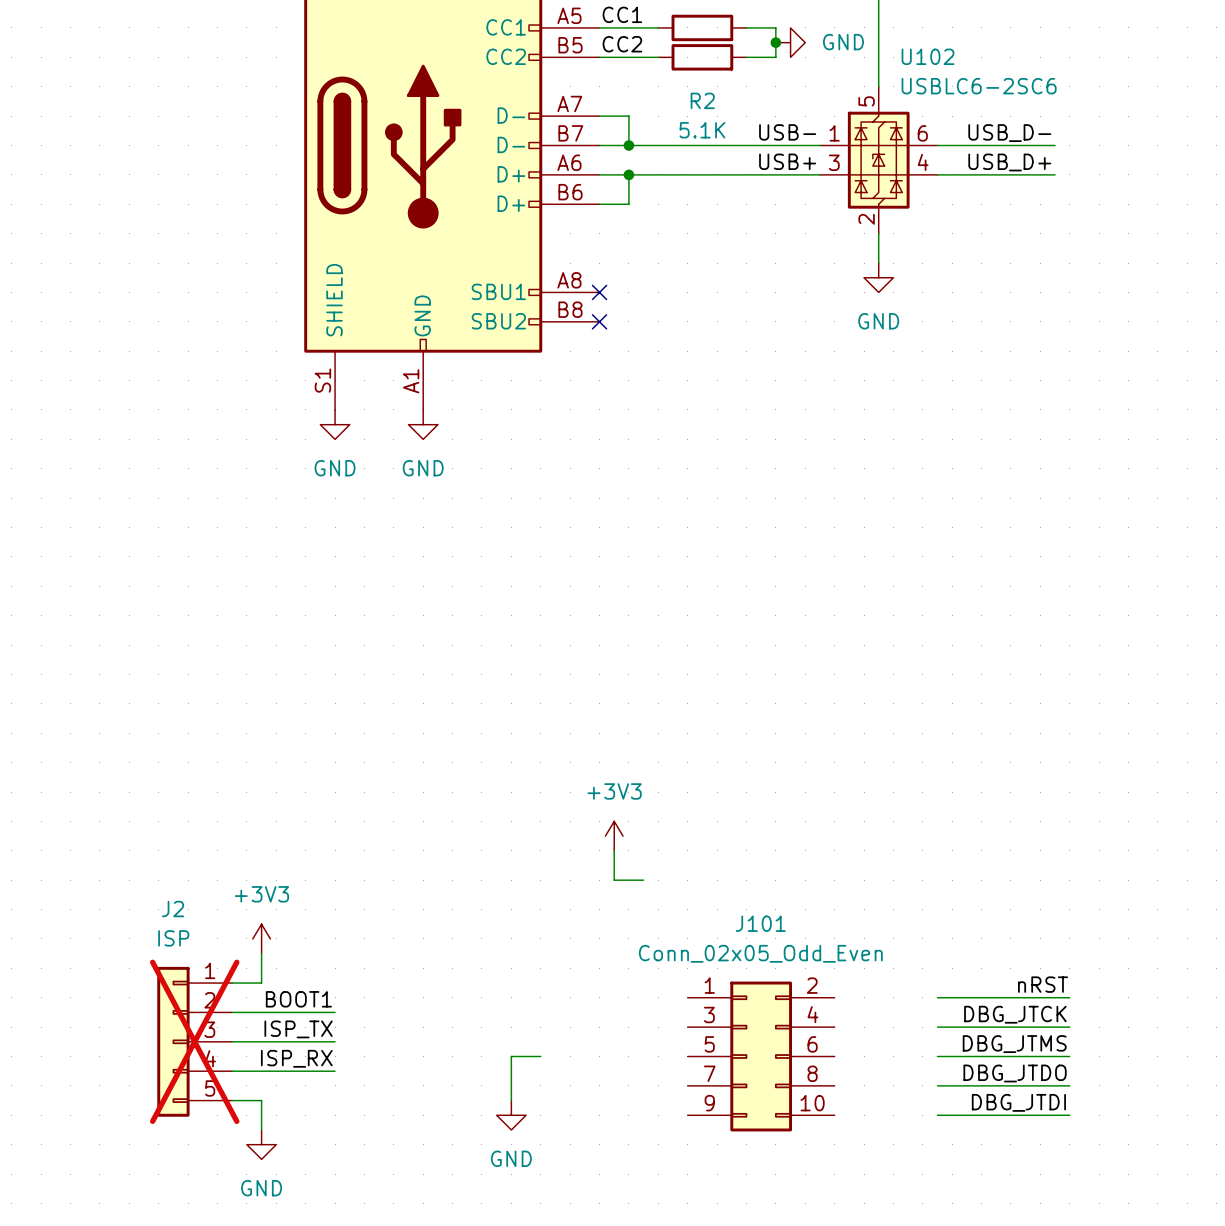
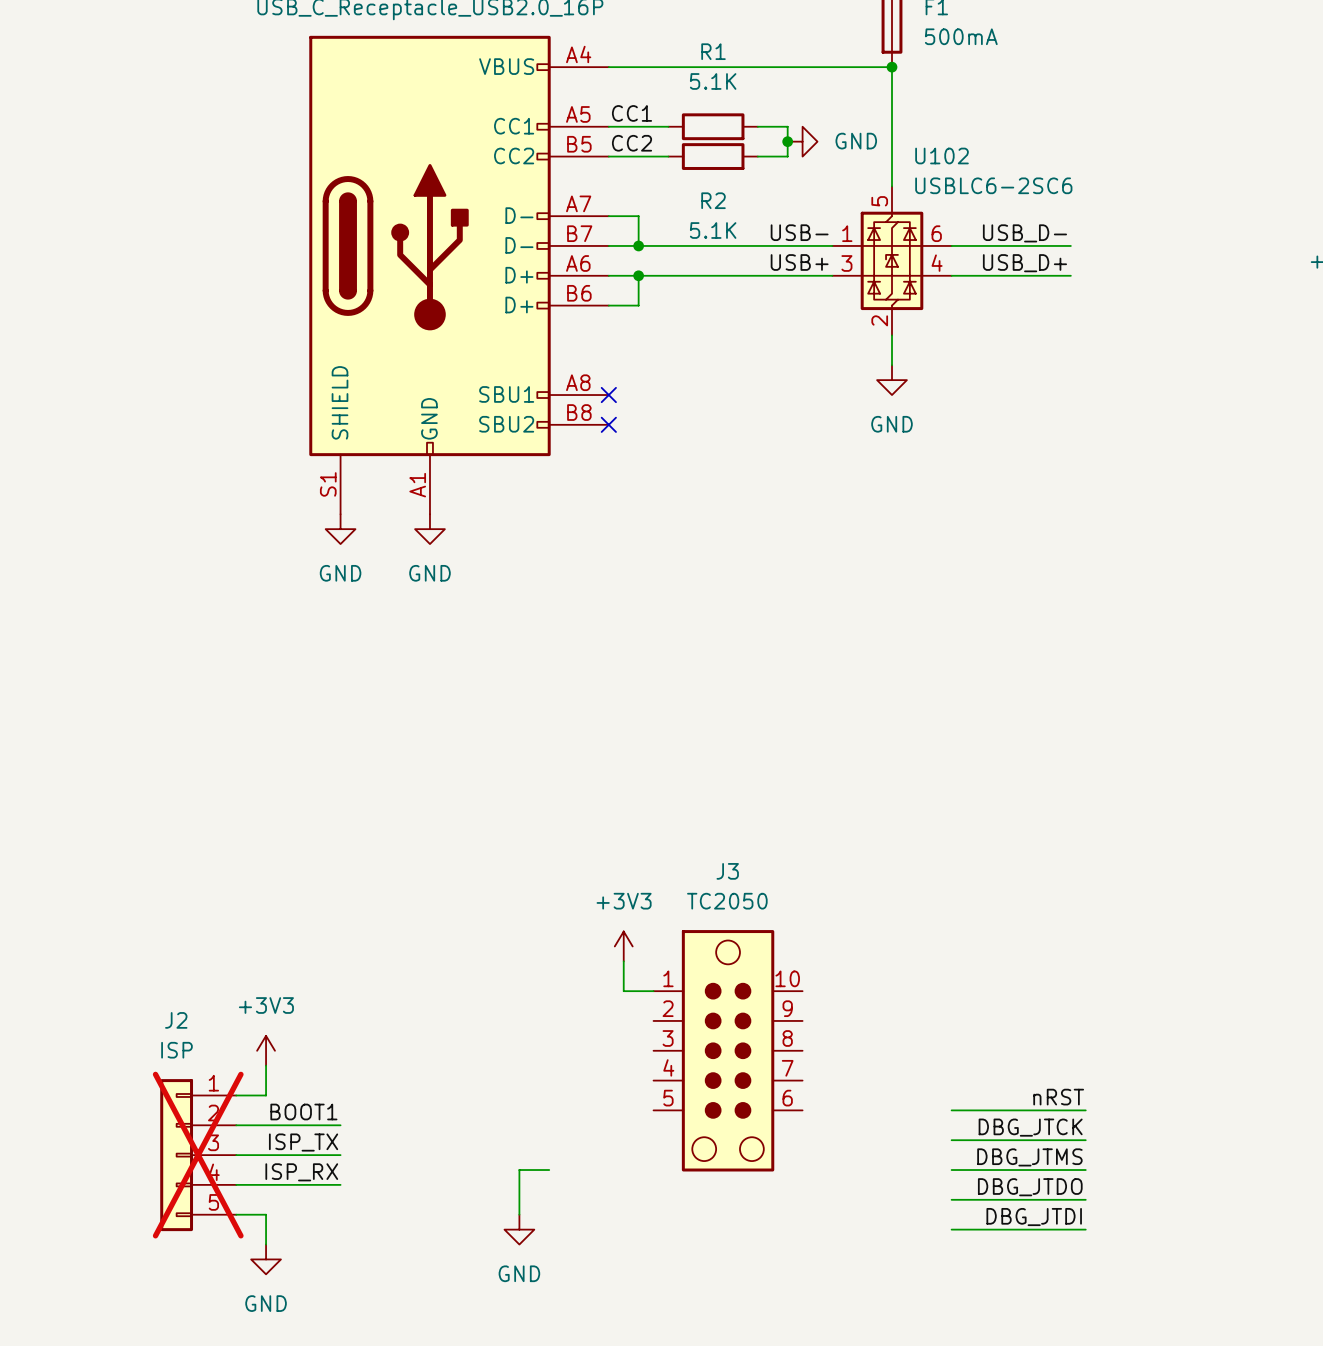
J3: none -> TC2050 (728, 1050)
J101: Conn_02x05_Odd_Even (761, 1056) -> none

